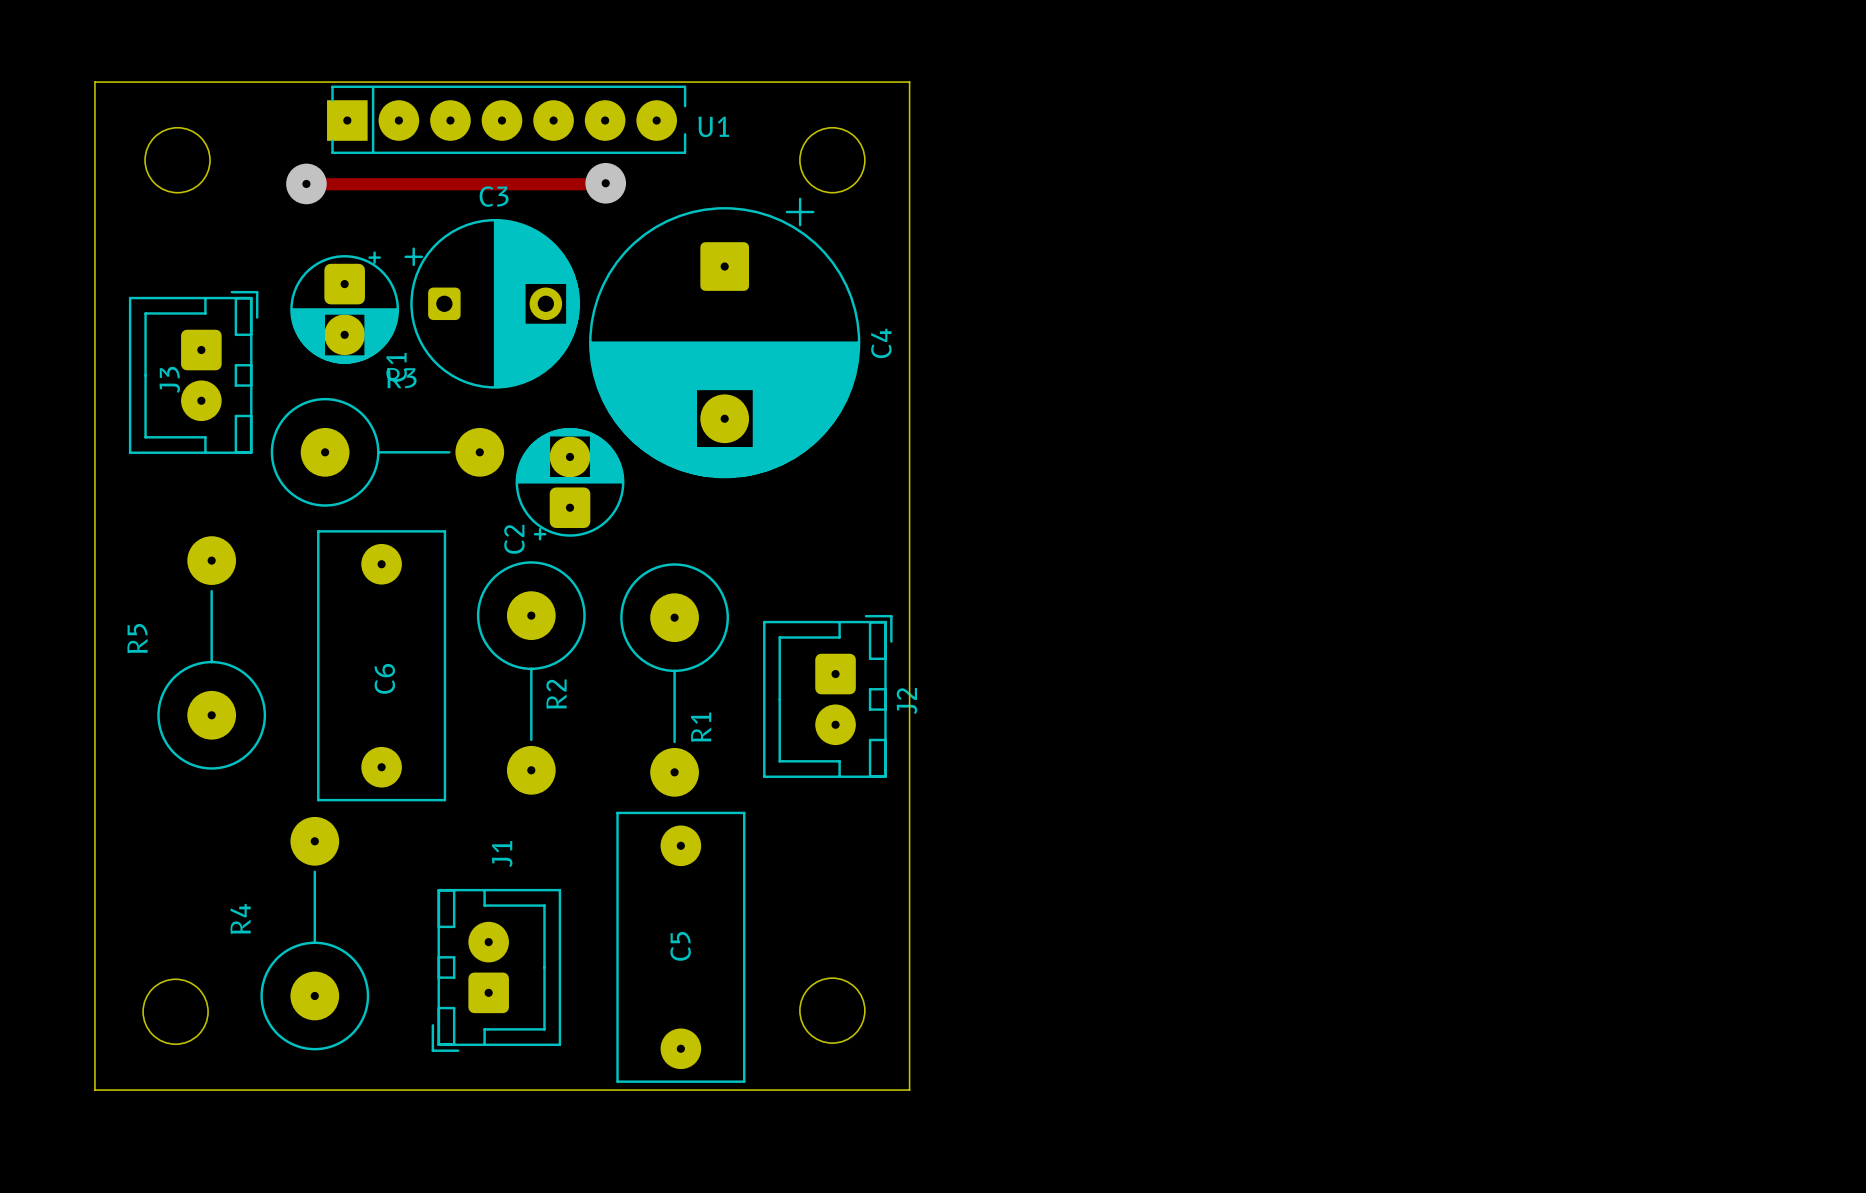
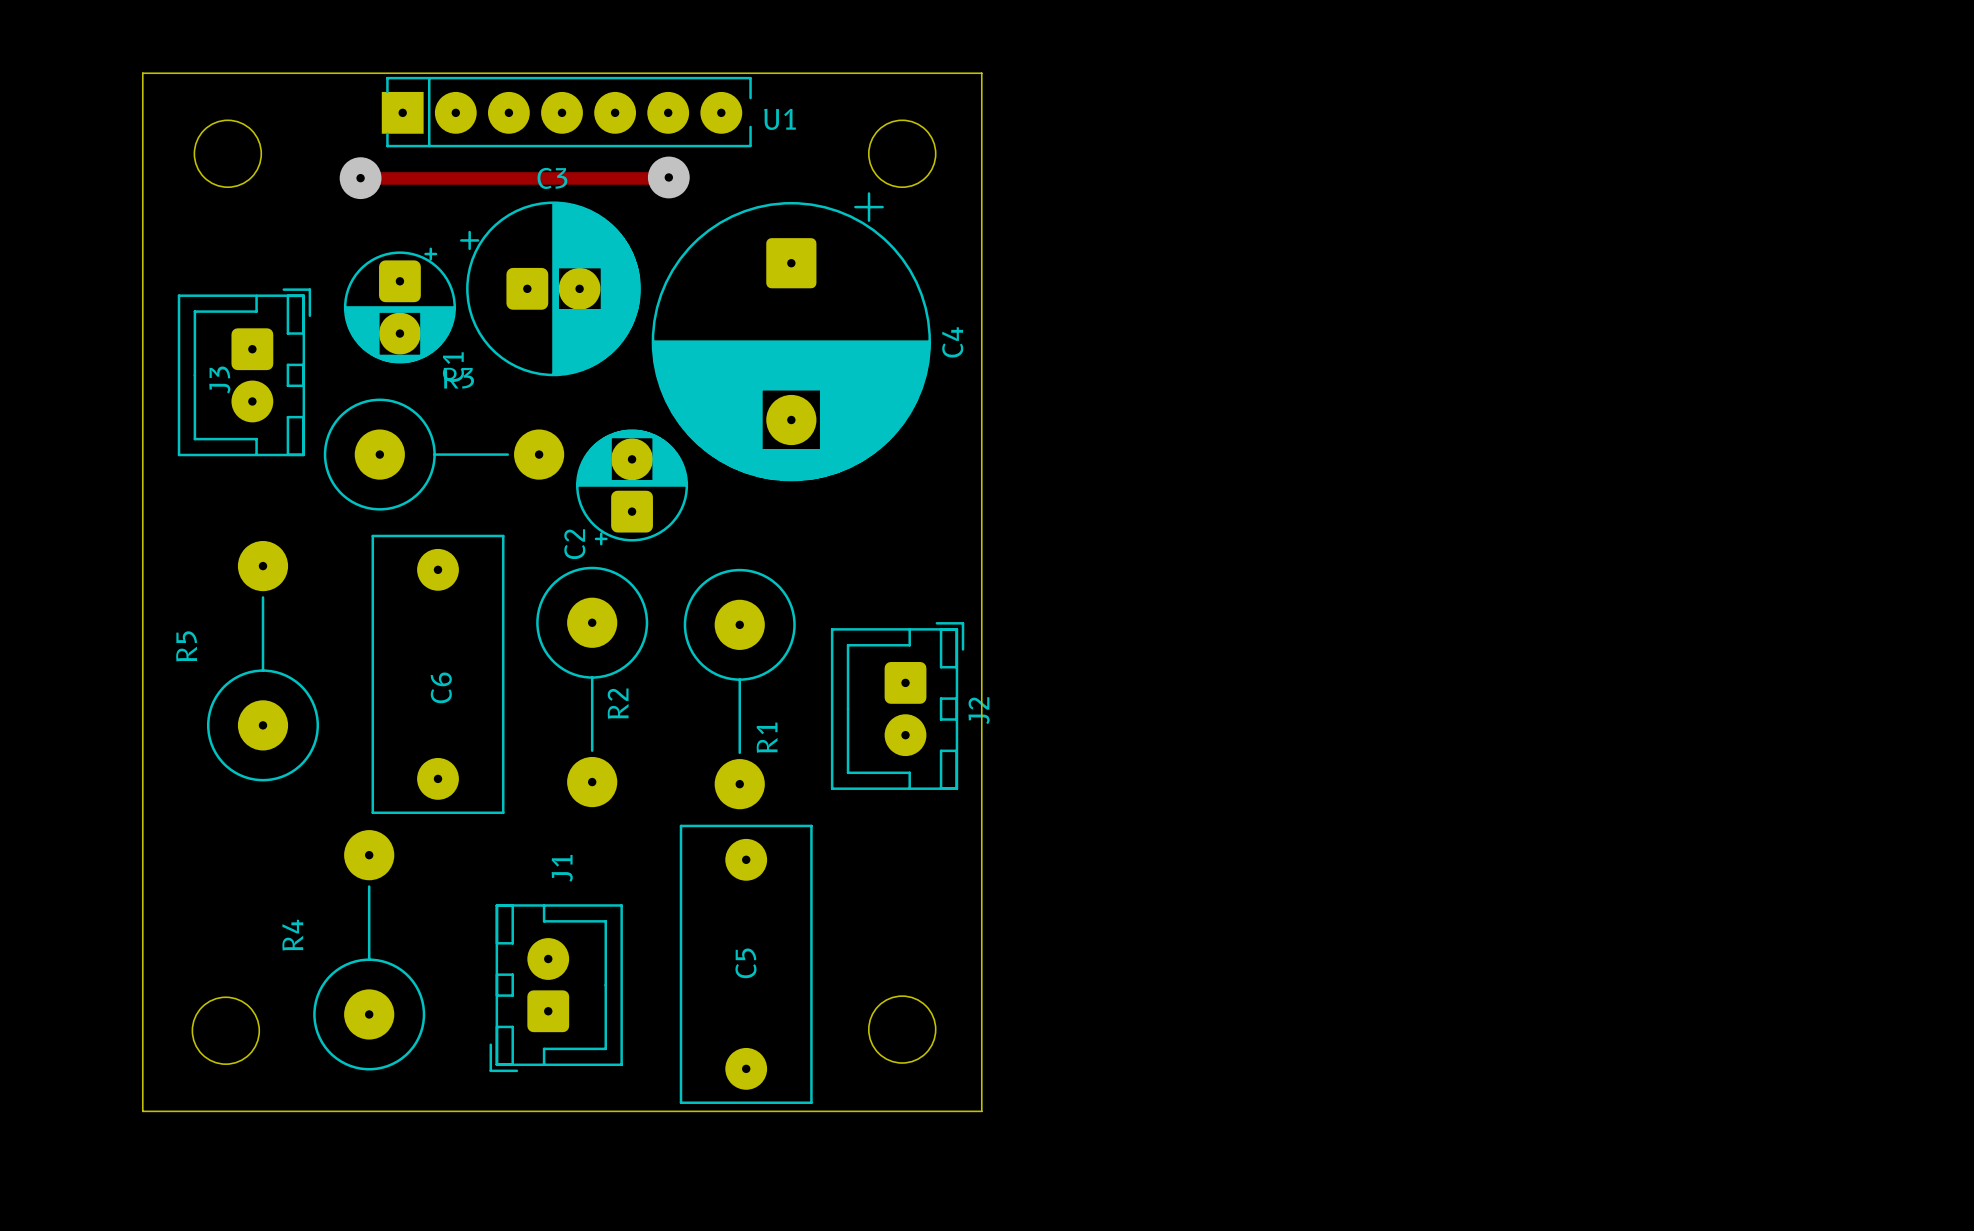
C3 footprint: [404, 218, 580, 389] -> [460, 201, 641, 377]

